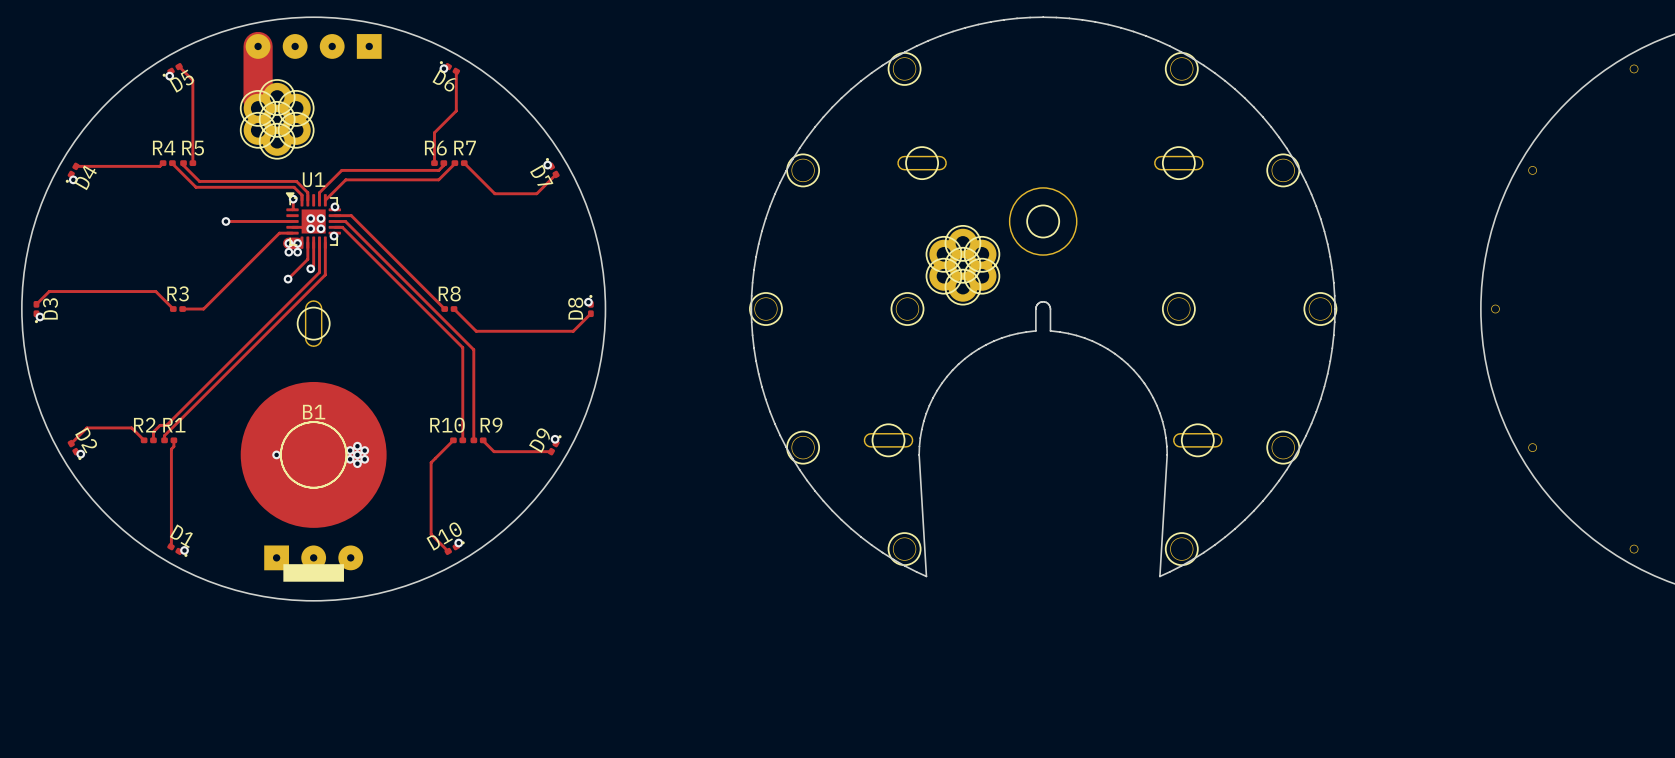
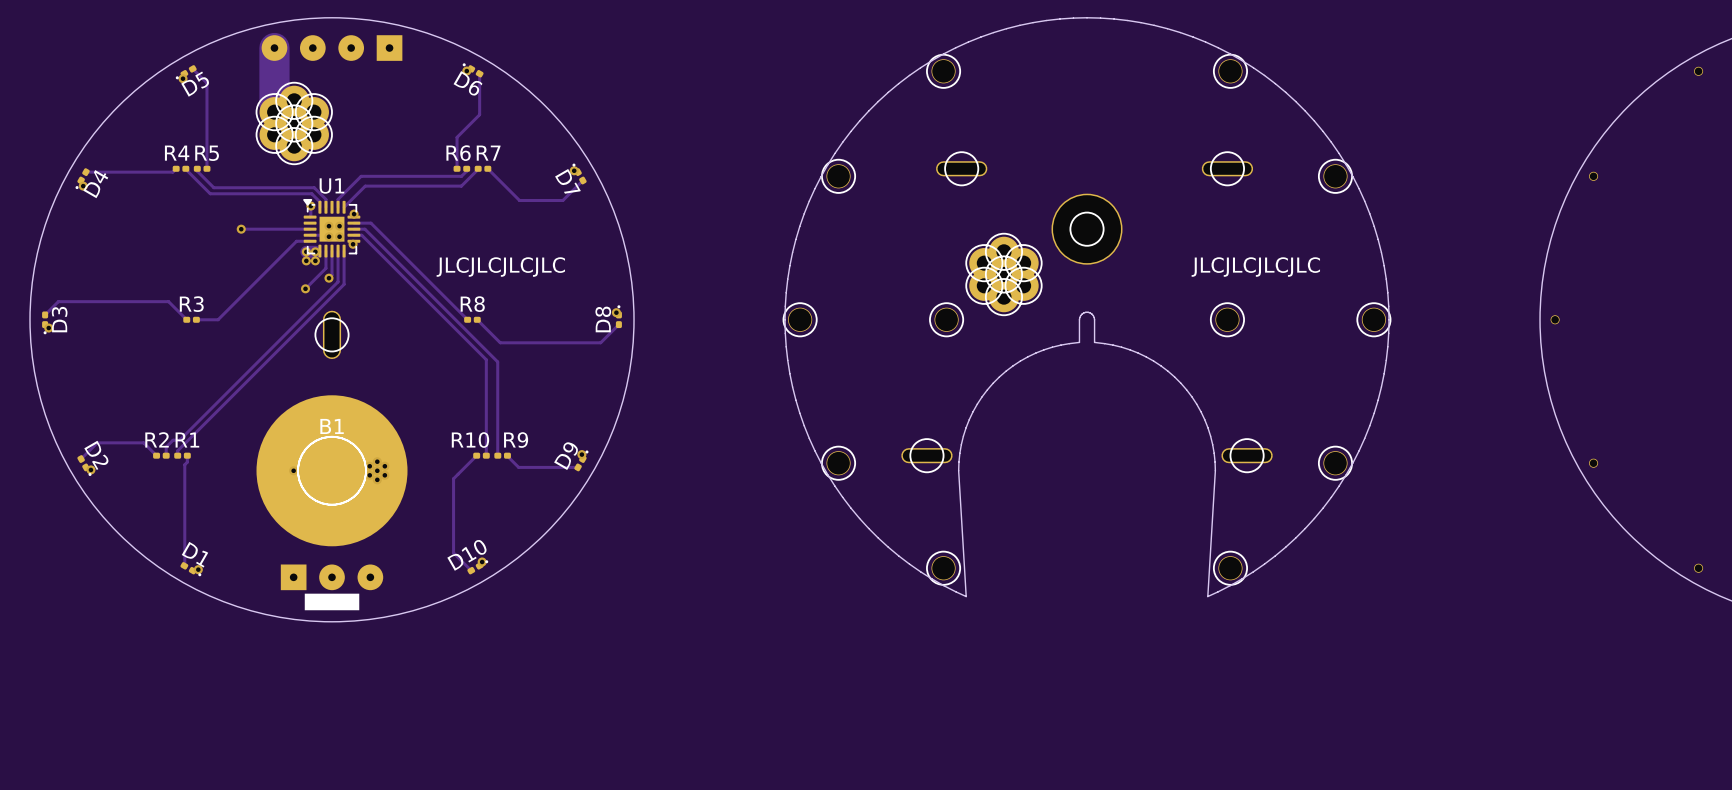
text: none -> JLCJLCJLCJLC (500, 267)
text: none -> JLCJLCJLCJLC (1255, 267)

